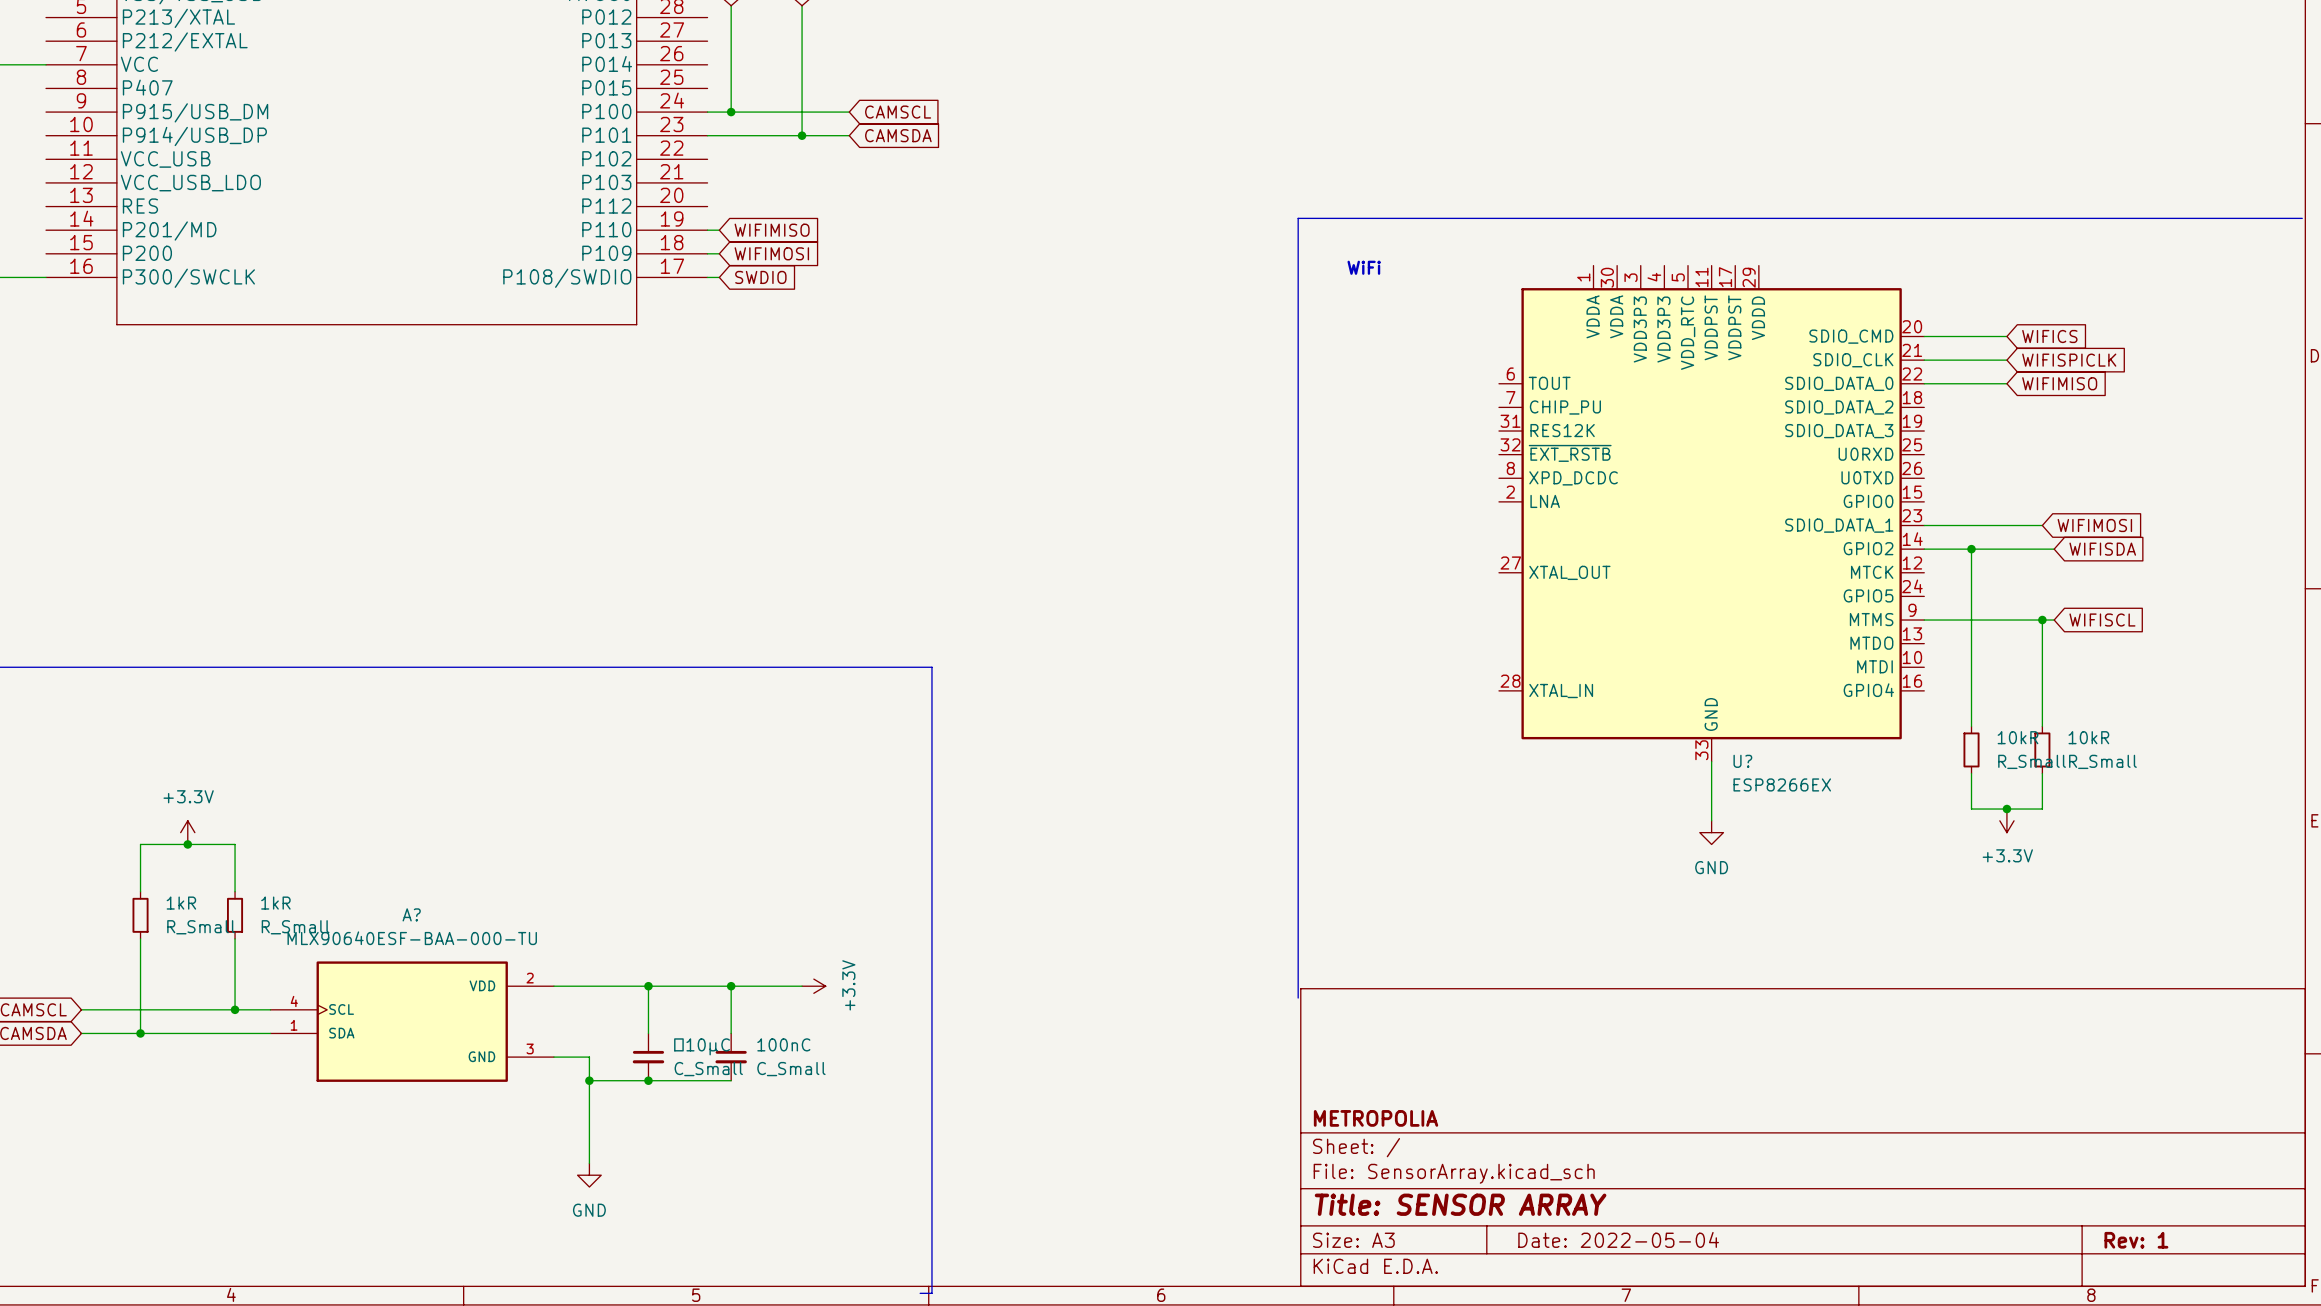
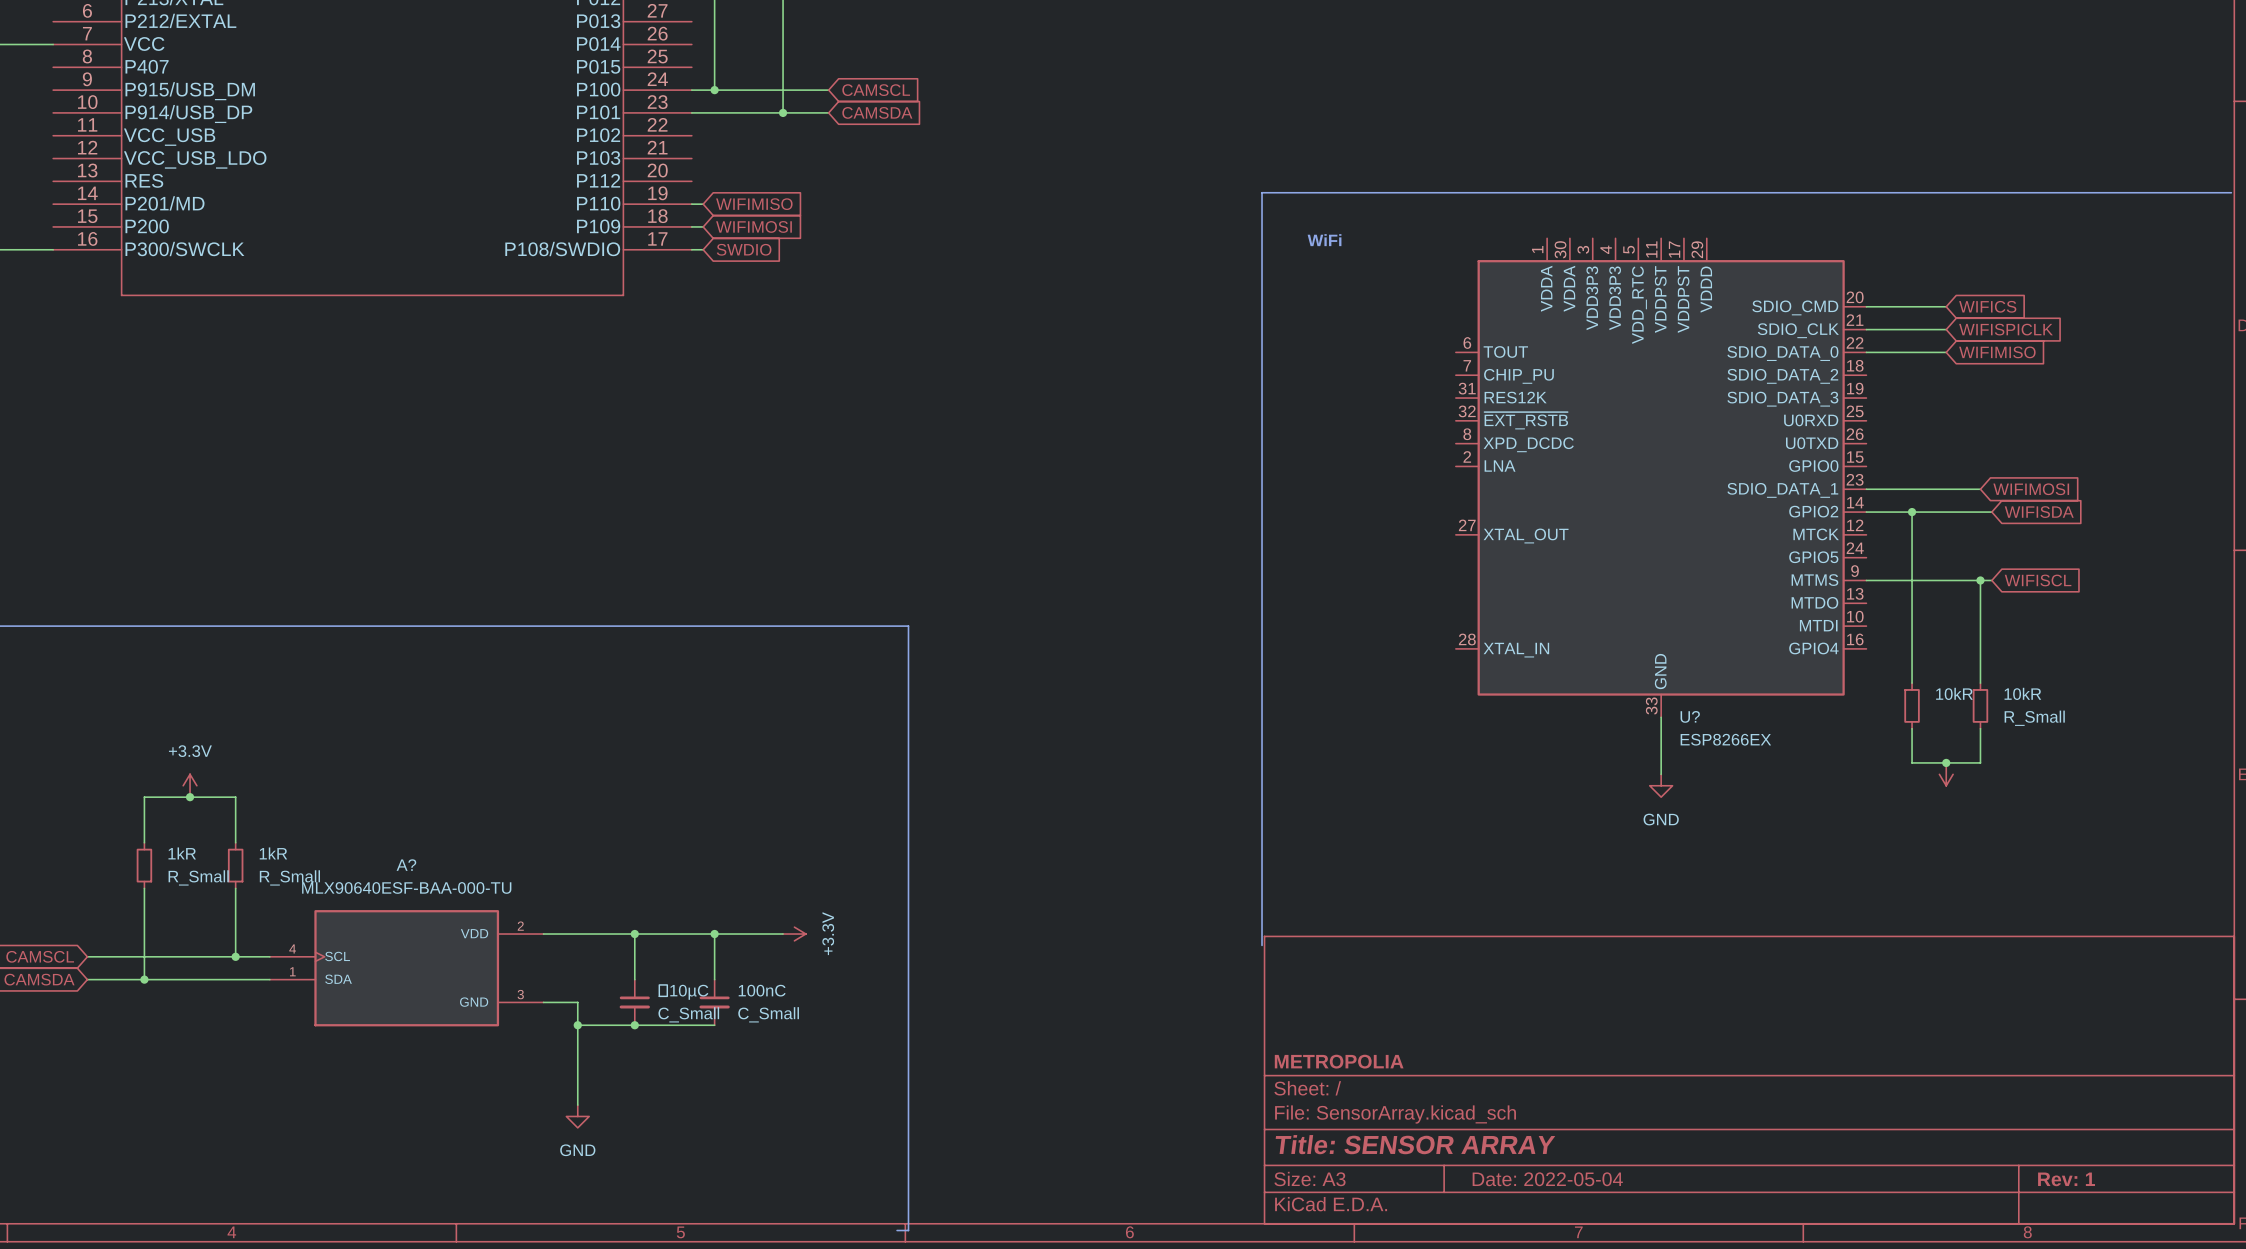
10kR value: R_Small (2032, 761) -> none
power symbol text: +3.3V (2007, 855) -> none

